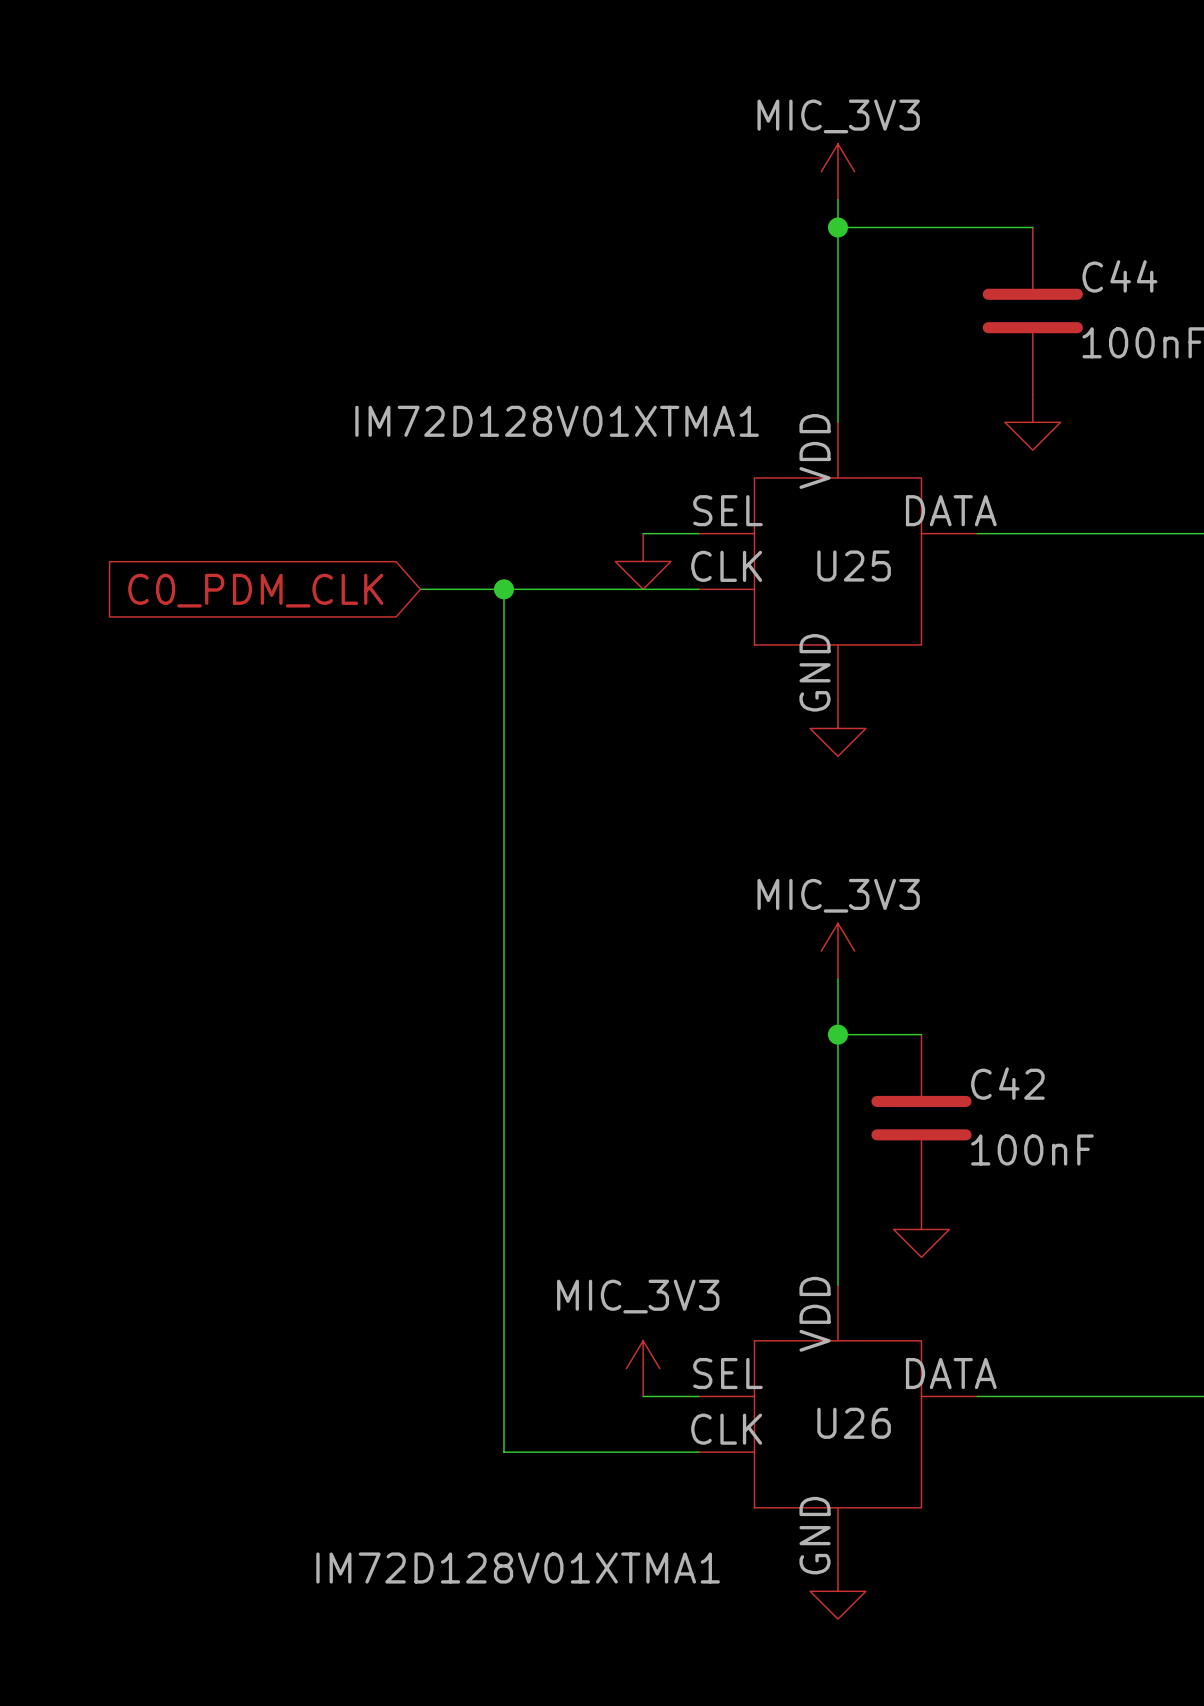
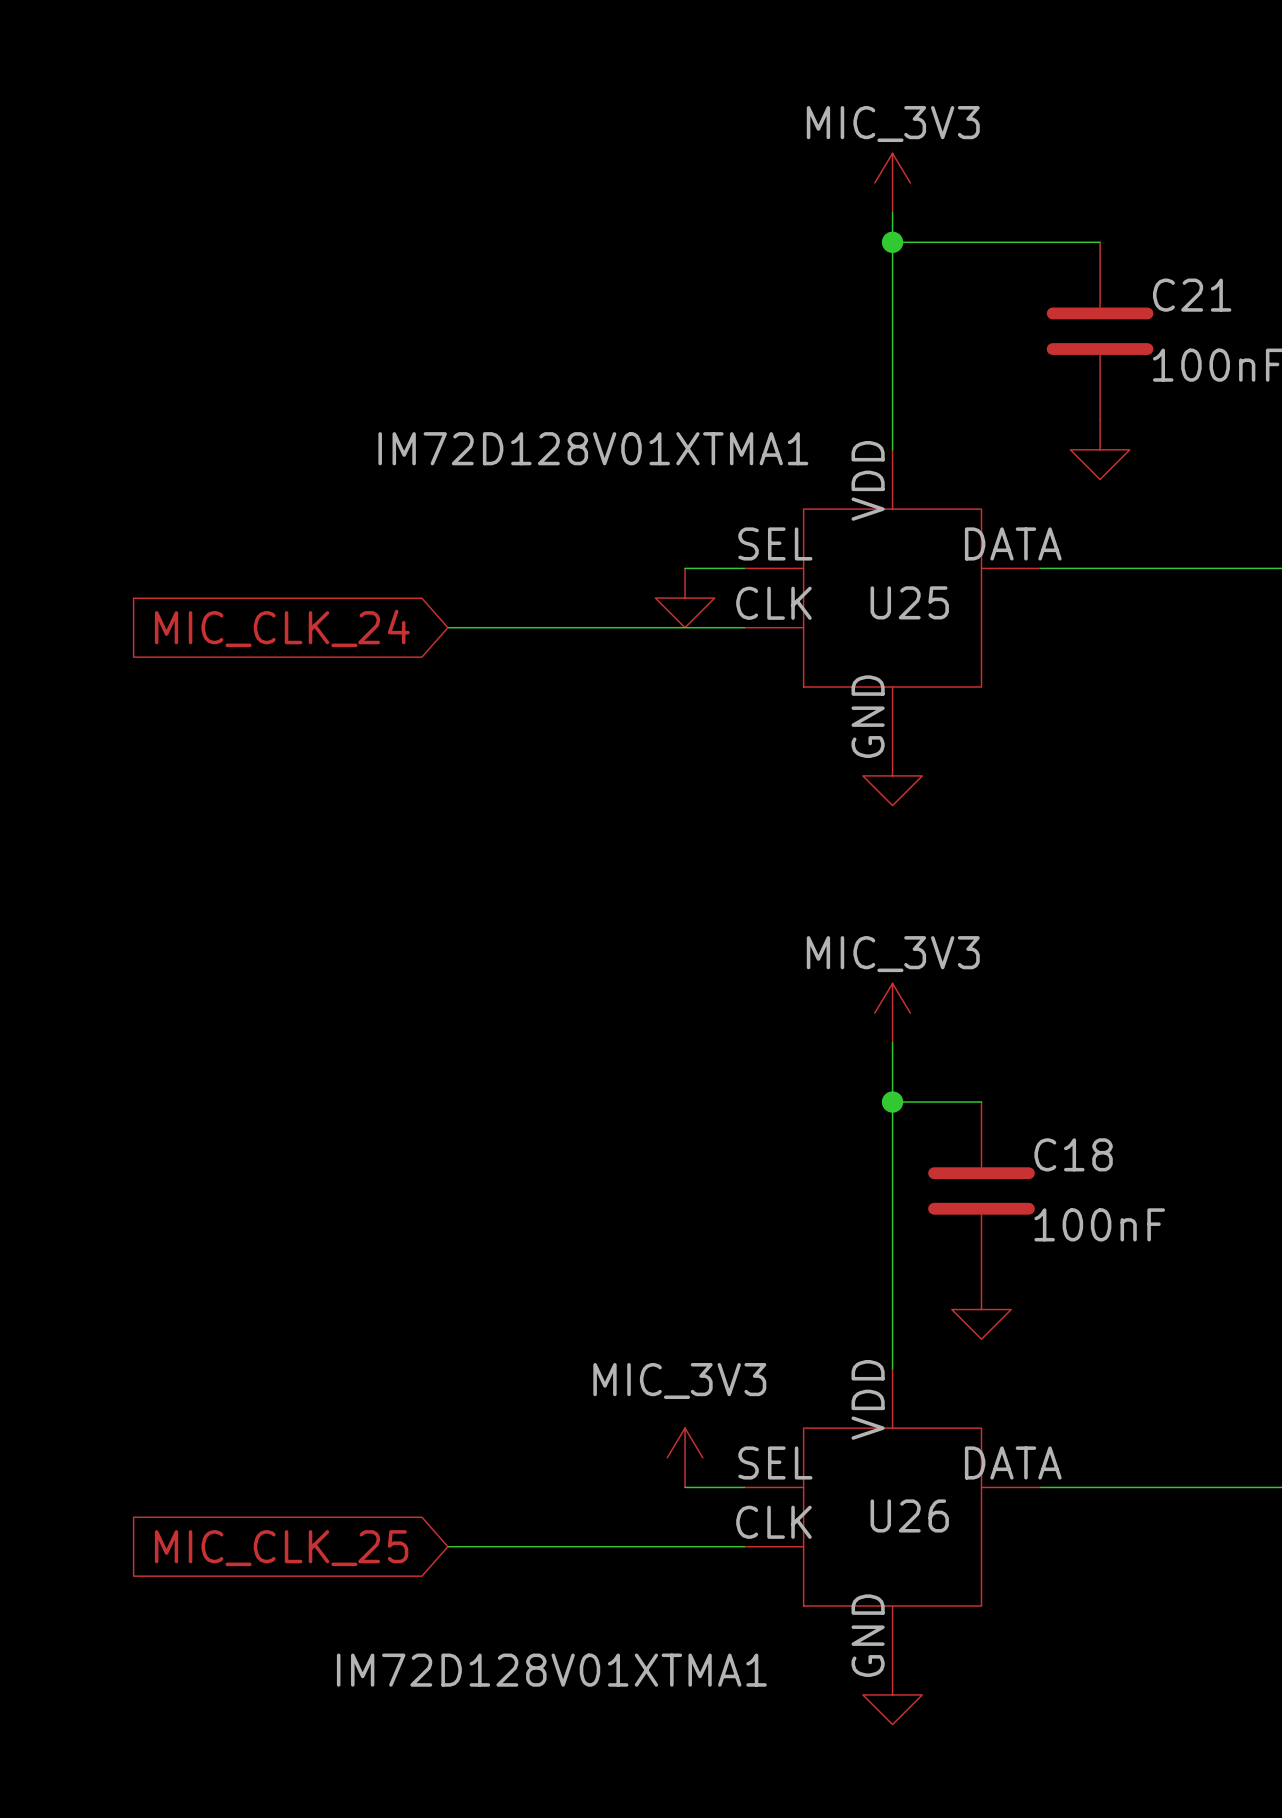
C44 name: C44 (1119, 276) -> C21 (1192, 295)
wire: (503, 589) (503, 1452) -> (447, 1546) (536, 1546)
junction: (503, 589) -> none
global label: C0_PDM_CLK (255, 590) -> MIC_CLK_24 (282, 628)
C42 name: C42 (1007, 1083) -> C18 (1073, 1154)
global label: none -> MIC_CLK_25 (281, 1548)

